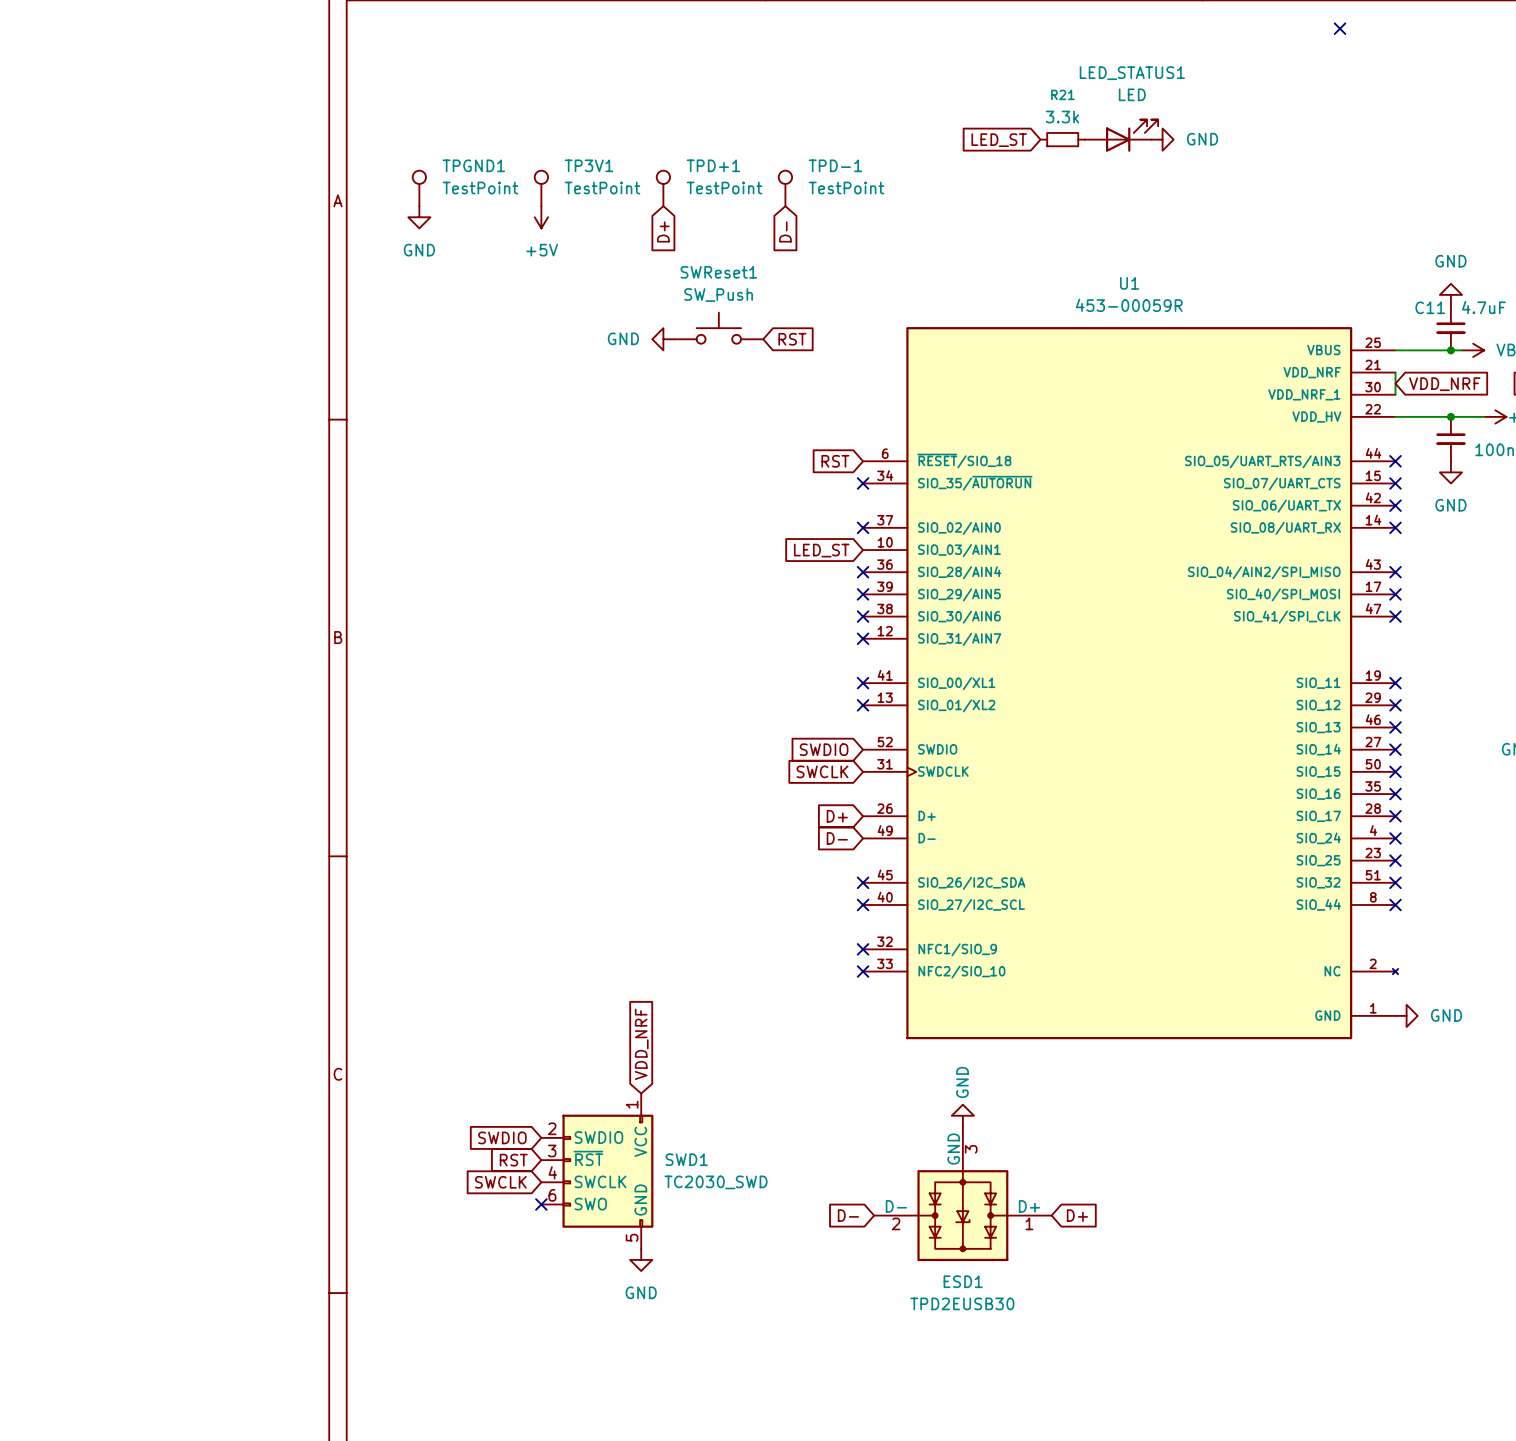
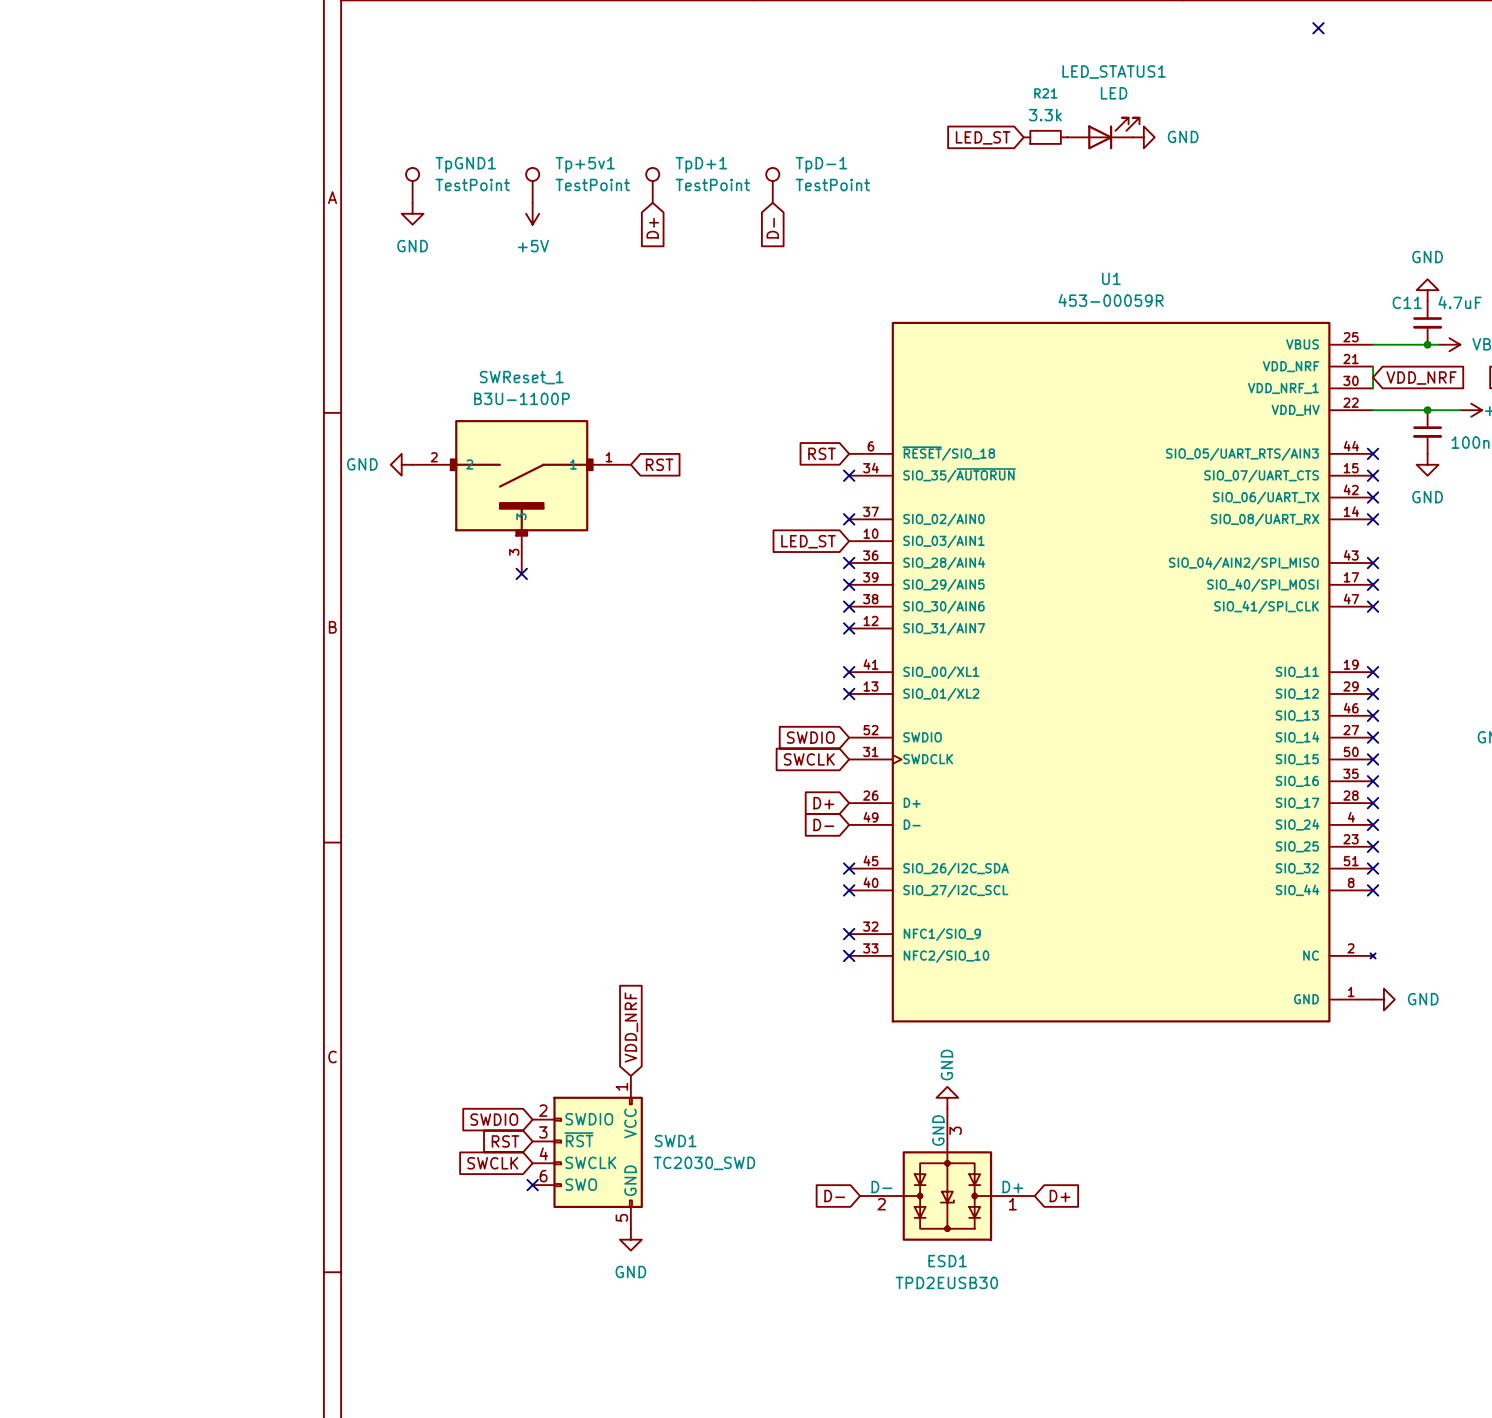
TPGND1 name: TPGND1 (473, 165) -> TpGND1 (465, 164)
TP3V1 name: TP3V1 (589, 165) -> Tp+5v1 (585, 164)
TPD+1 name: TPD+1 (713, 165) -> TpD+1 (701, 164)
TPD-1 name: TPD-1 (835, 165) -> TpD-1 (821, 164)
SWReset1: SW_Push (718, 328) -> none
power symbol: GND (663, 339) -> none
global label position: RST (792, 339) -> RST (659, 464)
power symbol: none -> GND (401, 464)
SWReset_1: none -> B3U-1100P (521, 496)
no-connect mark: none -> (521, 573)

